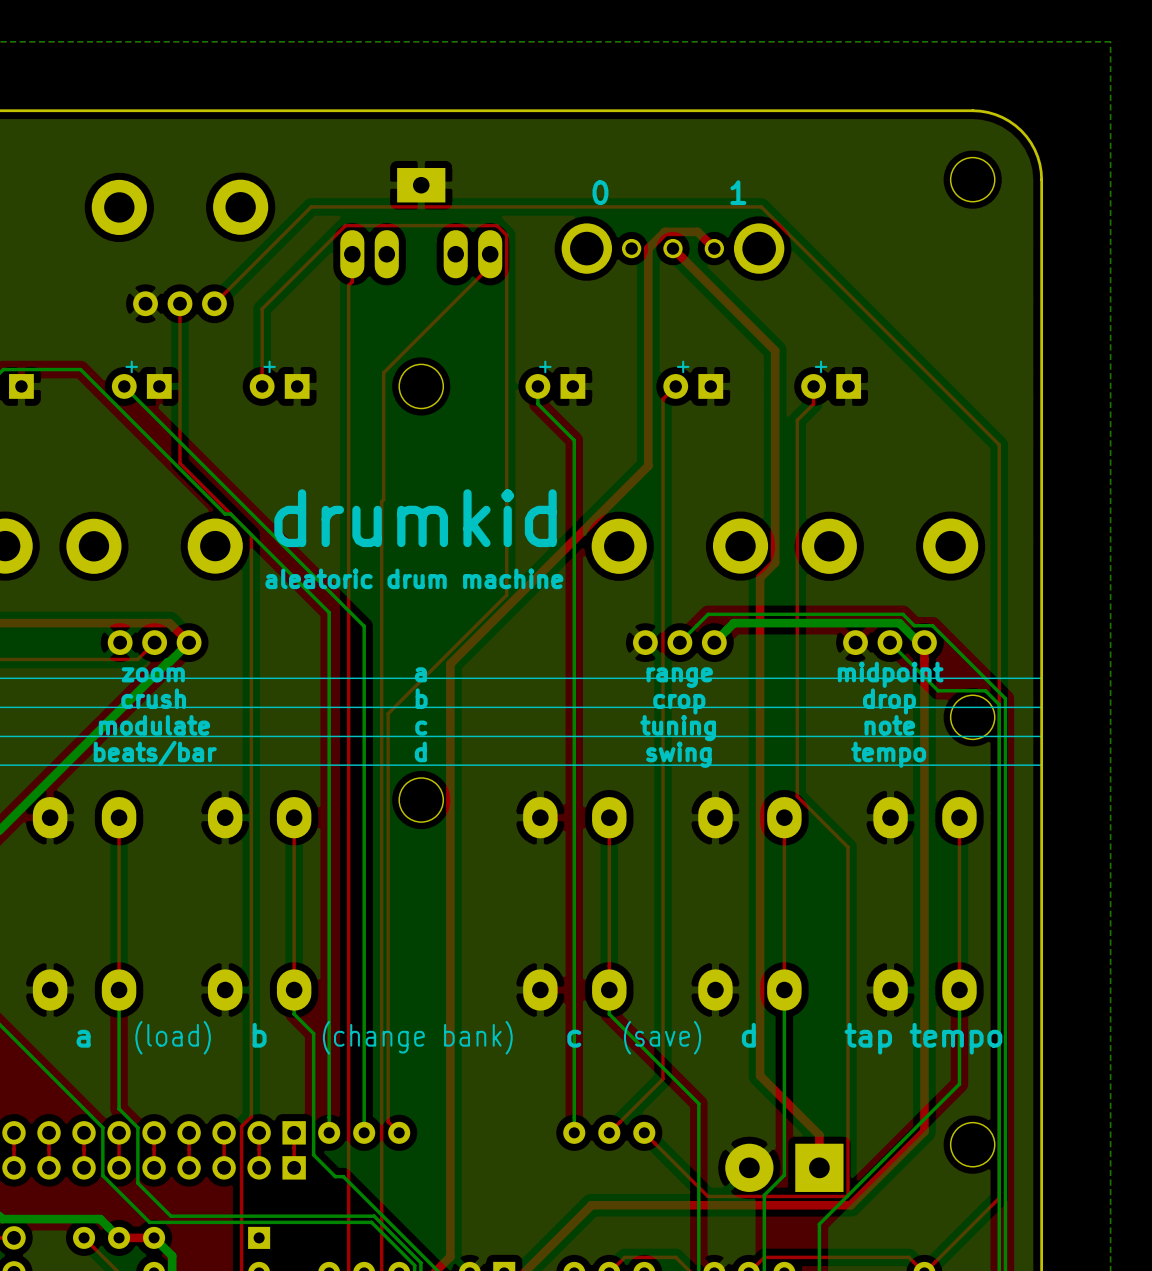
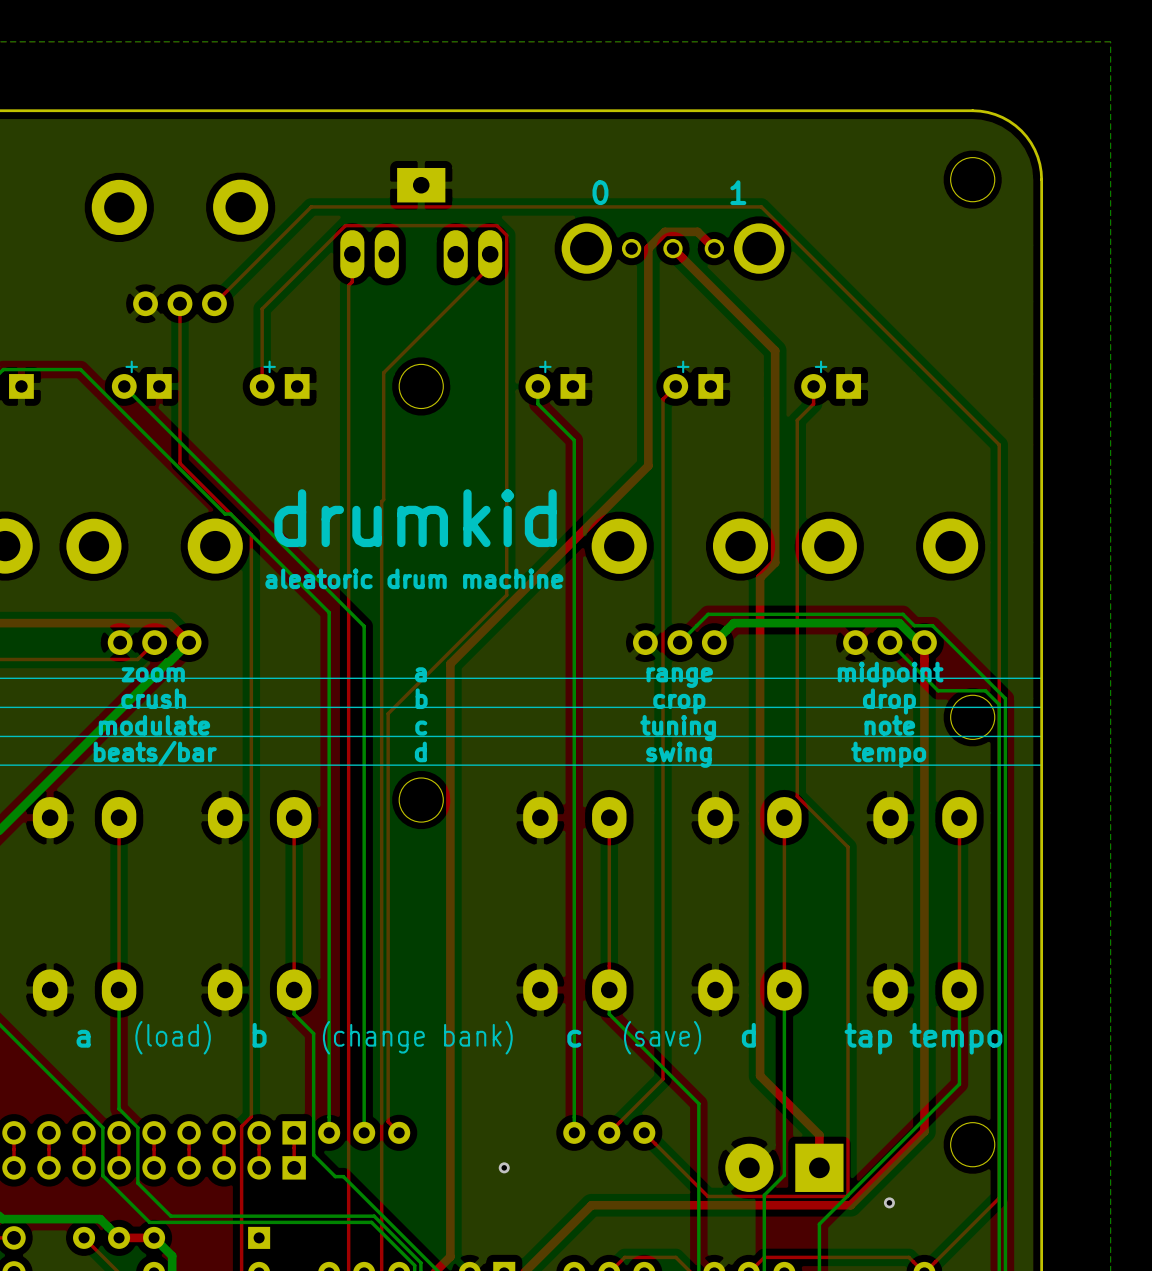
via: none -> (504, 1167)
via: none -> (889, 1202)

